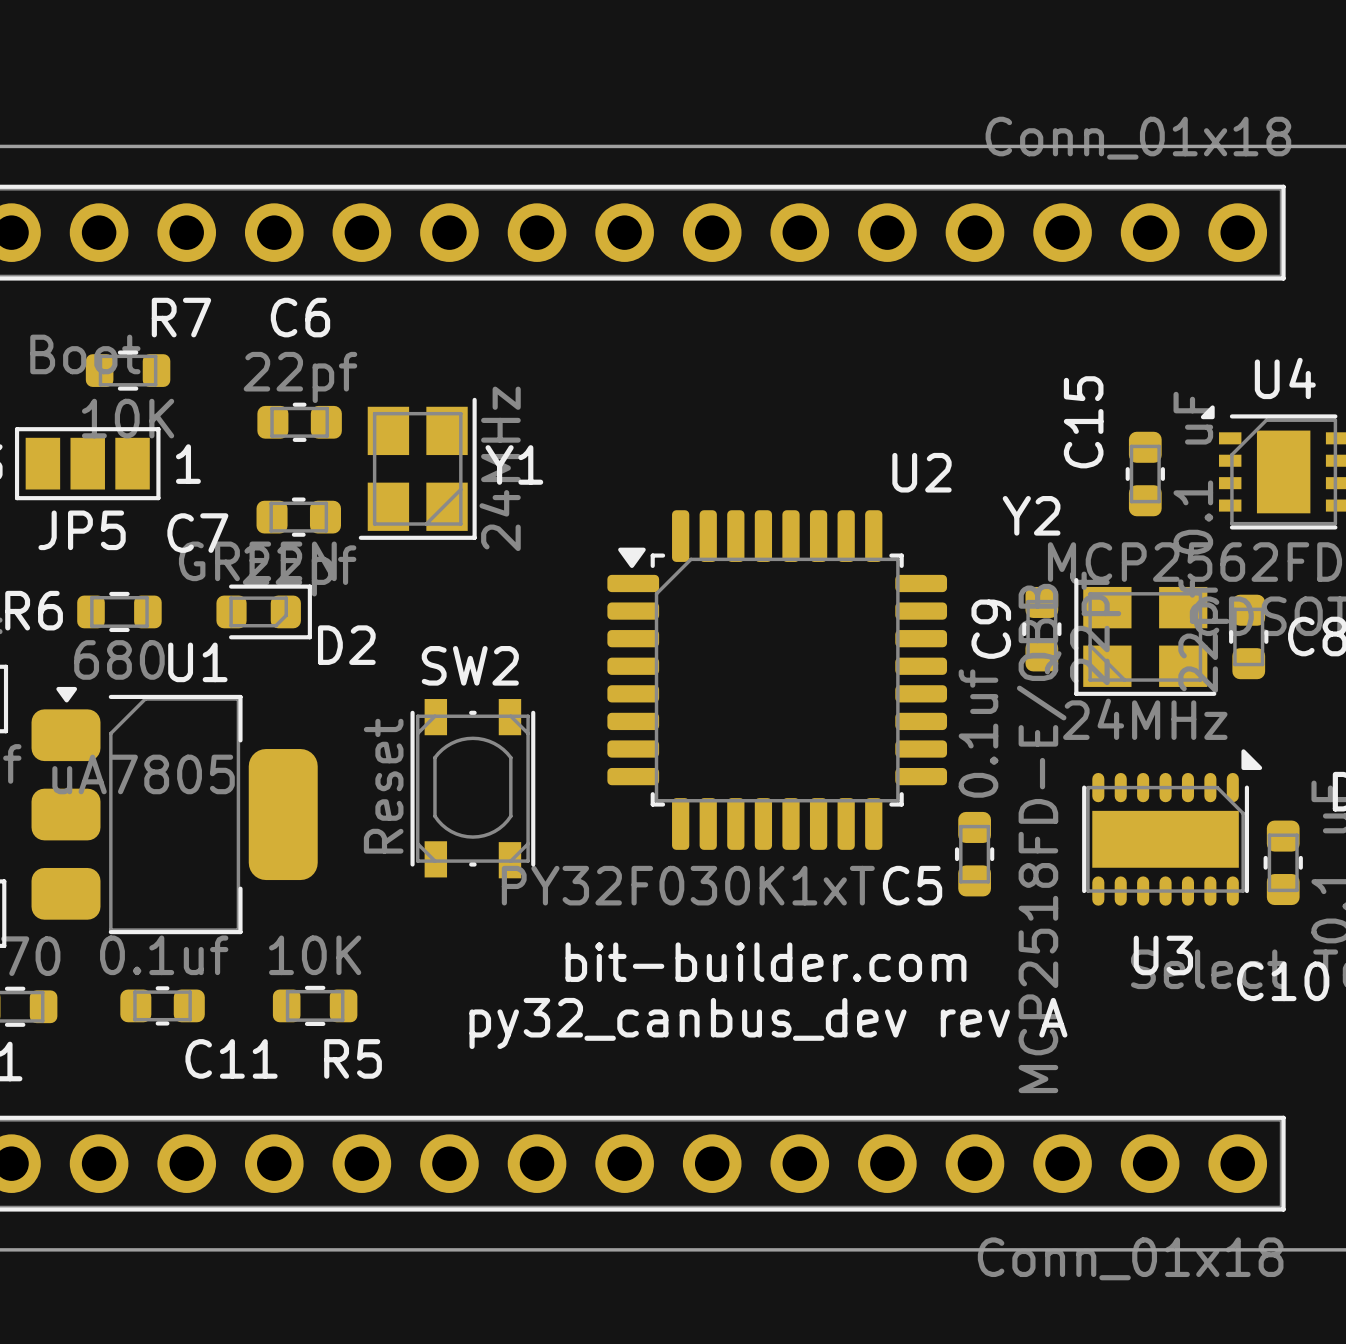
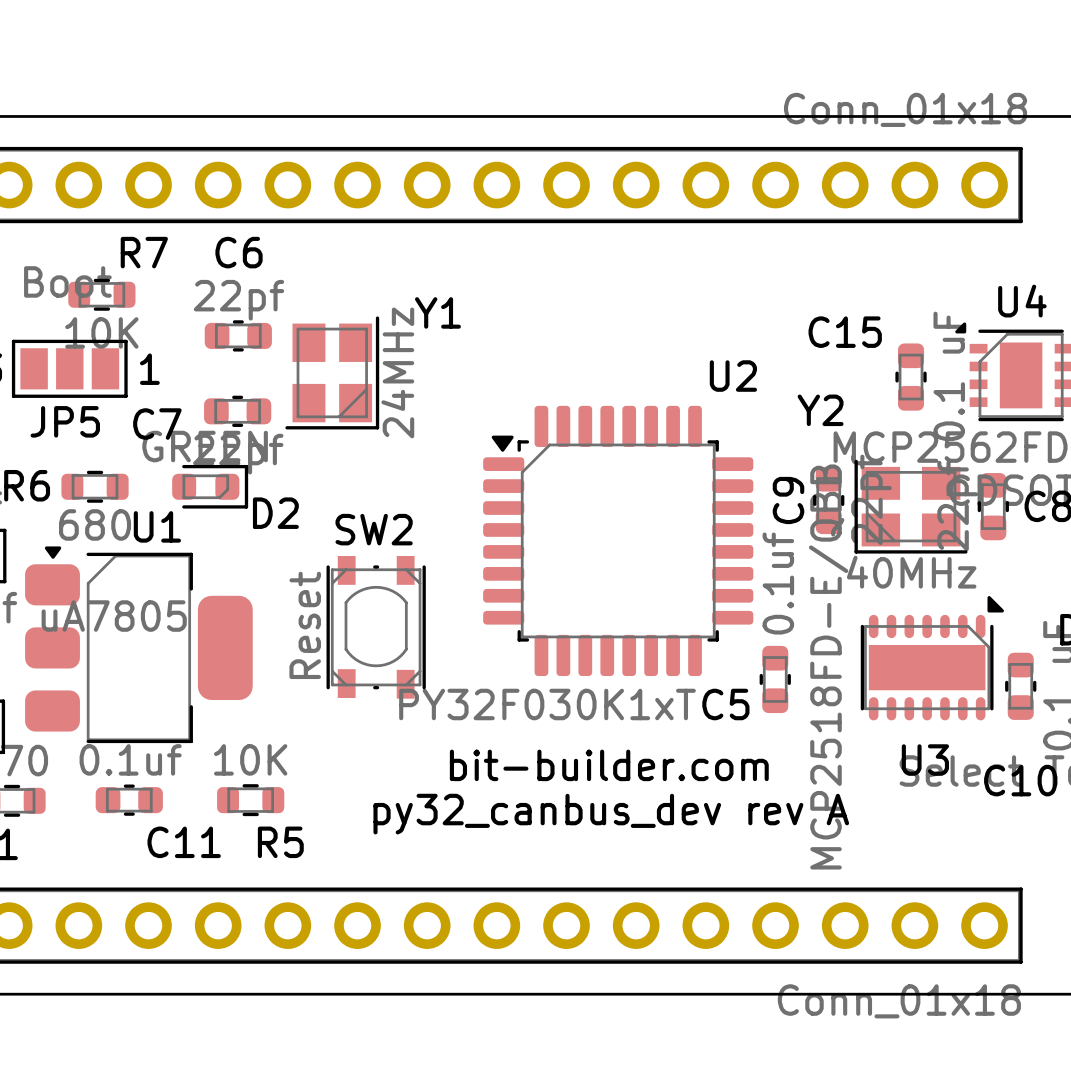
C15 name rotation: 0° (1083, 422) -> 90° clockwise (845, 332)
Y1 name position: Y1 (514, 464) -> Y1 (437, 312)
Y2 value: 24MHz (1145, 719) -> 40MHz (911, 572)

